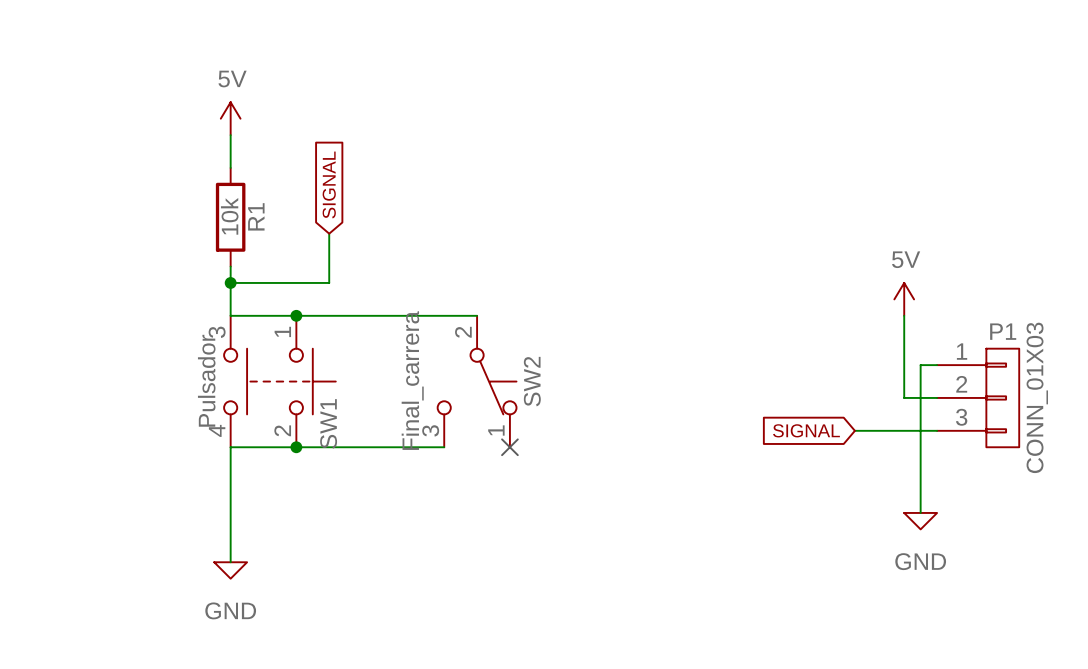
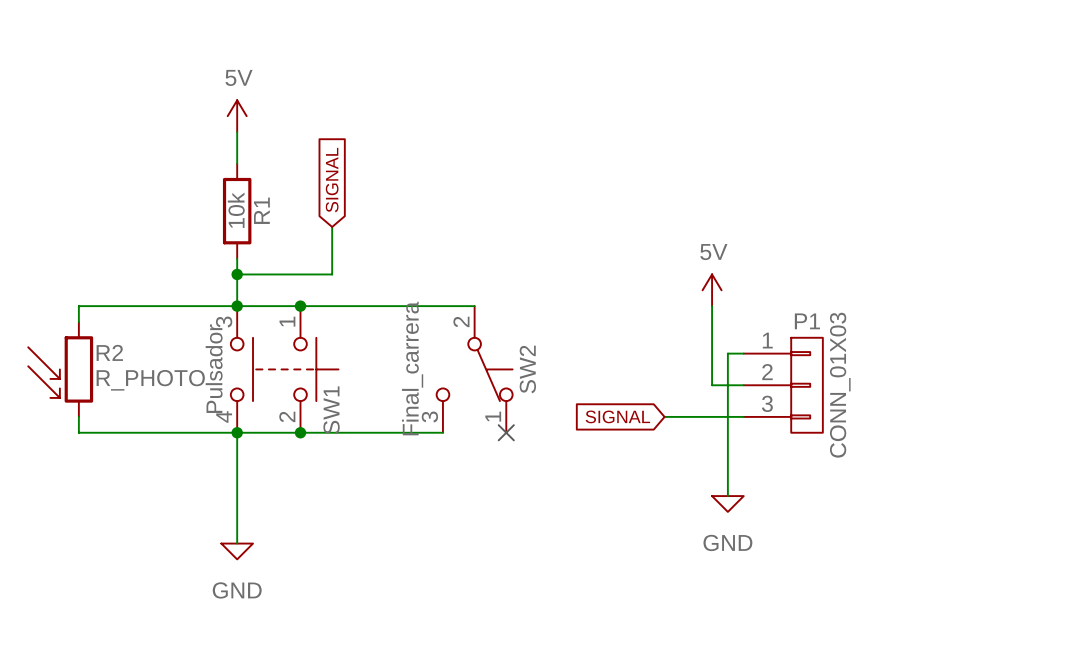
power symbol position: 5V (904, 299) -> 5V (712, 290)
wire: none -> (237, 306) (78, 306) (78, 321)
junction: none -> (237, 306)
wire: (904, 315) (904, 397) (937, 397) -> (712, 306) (712, 385) (743, 385)
wire: (937, 365) (920, 365) (920, 512) -> (743, 353) (727, 353) (727, 496)
R2: none -> R_PHOTO (60, 369)
P1 position: (978, 397) -> (783, 385)
wire: none -> (78, 416) (78, 432) (237, 432)
global label position: SIGNAL (806, 430) -> SIGNAL (617, 416)
wire: (854, 430) (937, 430) -> (664, 416) (743, 416)
junction: none -> (237, 432)
power symbol position: GND (920, 521) -> GND (727, 503)

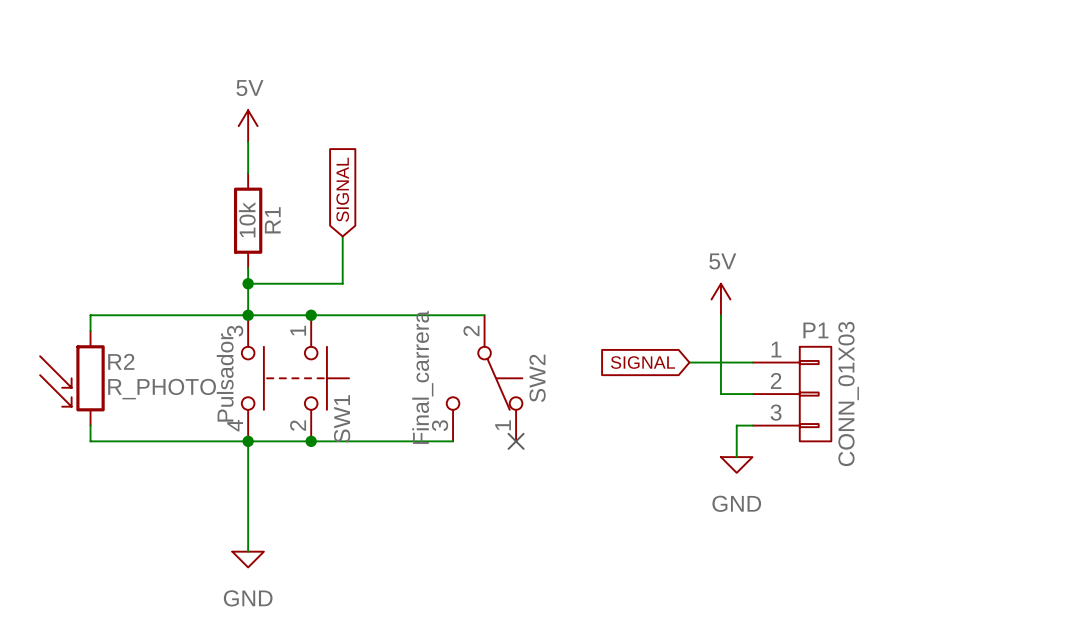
wire: (727, 353) (727, 416) (664, 416) -> (736, 362) (689, 362)
global label position: SIGNAL (617, 416) -> SIGNAL (642, 362)
wire: (727, 448) (727, 496) -> none
power symbol position: GND (727, 503) -> GND (736, 464)

